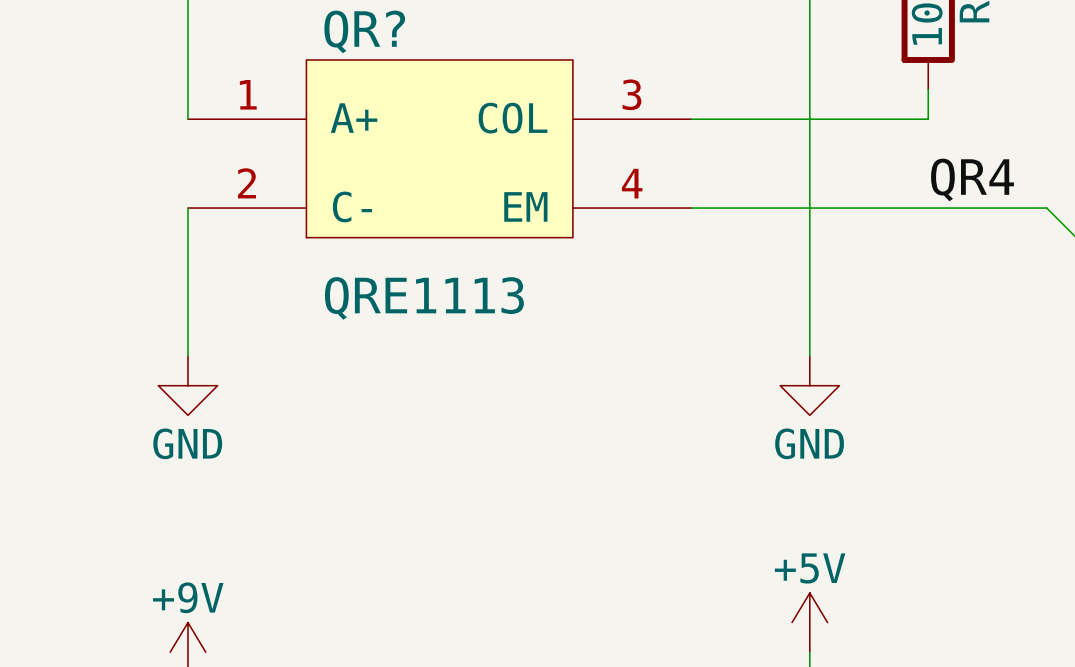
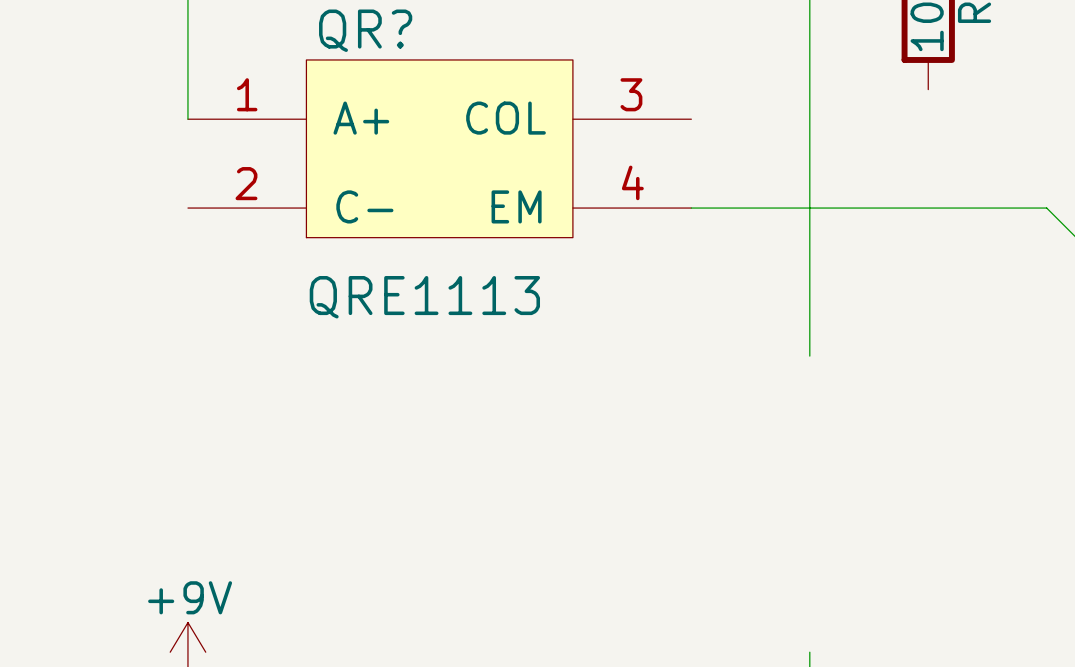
wire: (928, 89) (928, 119) (691, 119) -> none
label: QR4 (972, 179) -> none
wire: (187, 208) (187, 356) -> none
power symbol: GND (187, 385) -> none
power symbol: GND (809, 385) -> none
power symbol: +5V (809, 622) -> none

